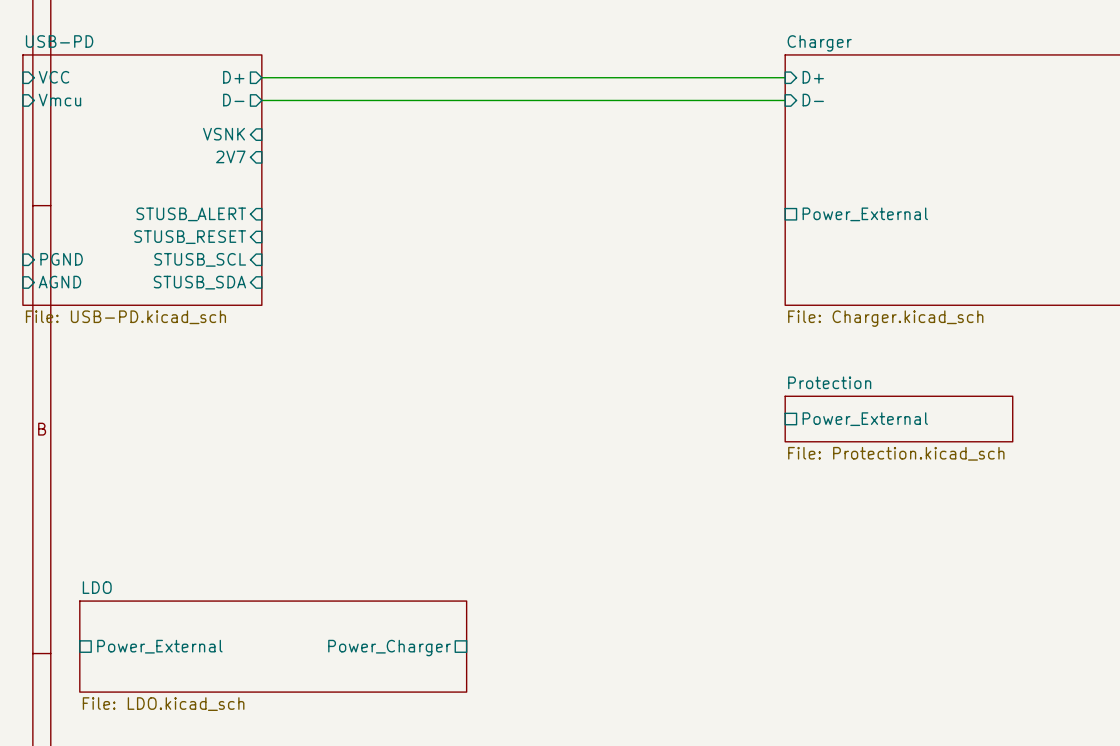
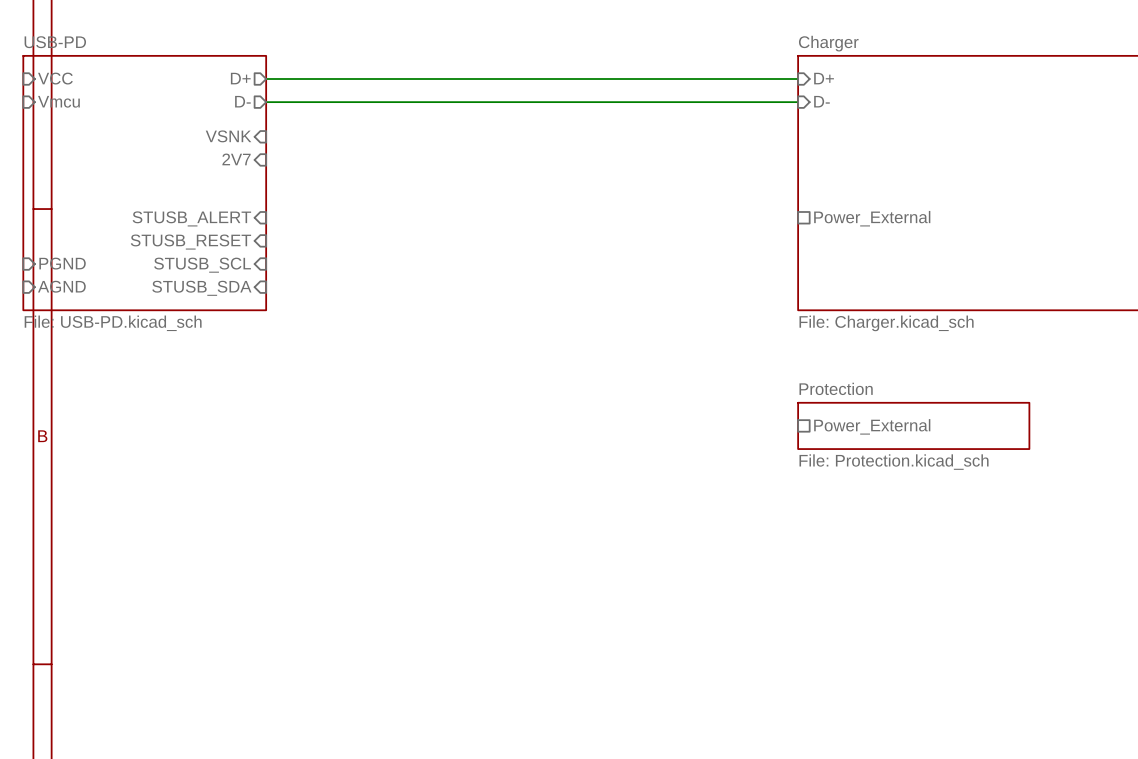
sheet pin: Power_External (159, 646) -> none
sheet LDO: File: LDO.kicad_sch (273, 646) -> none
sheet pin: Power_Charger (389, 648) -> none

